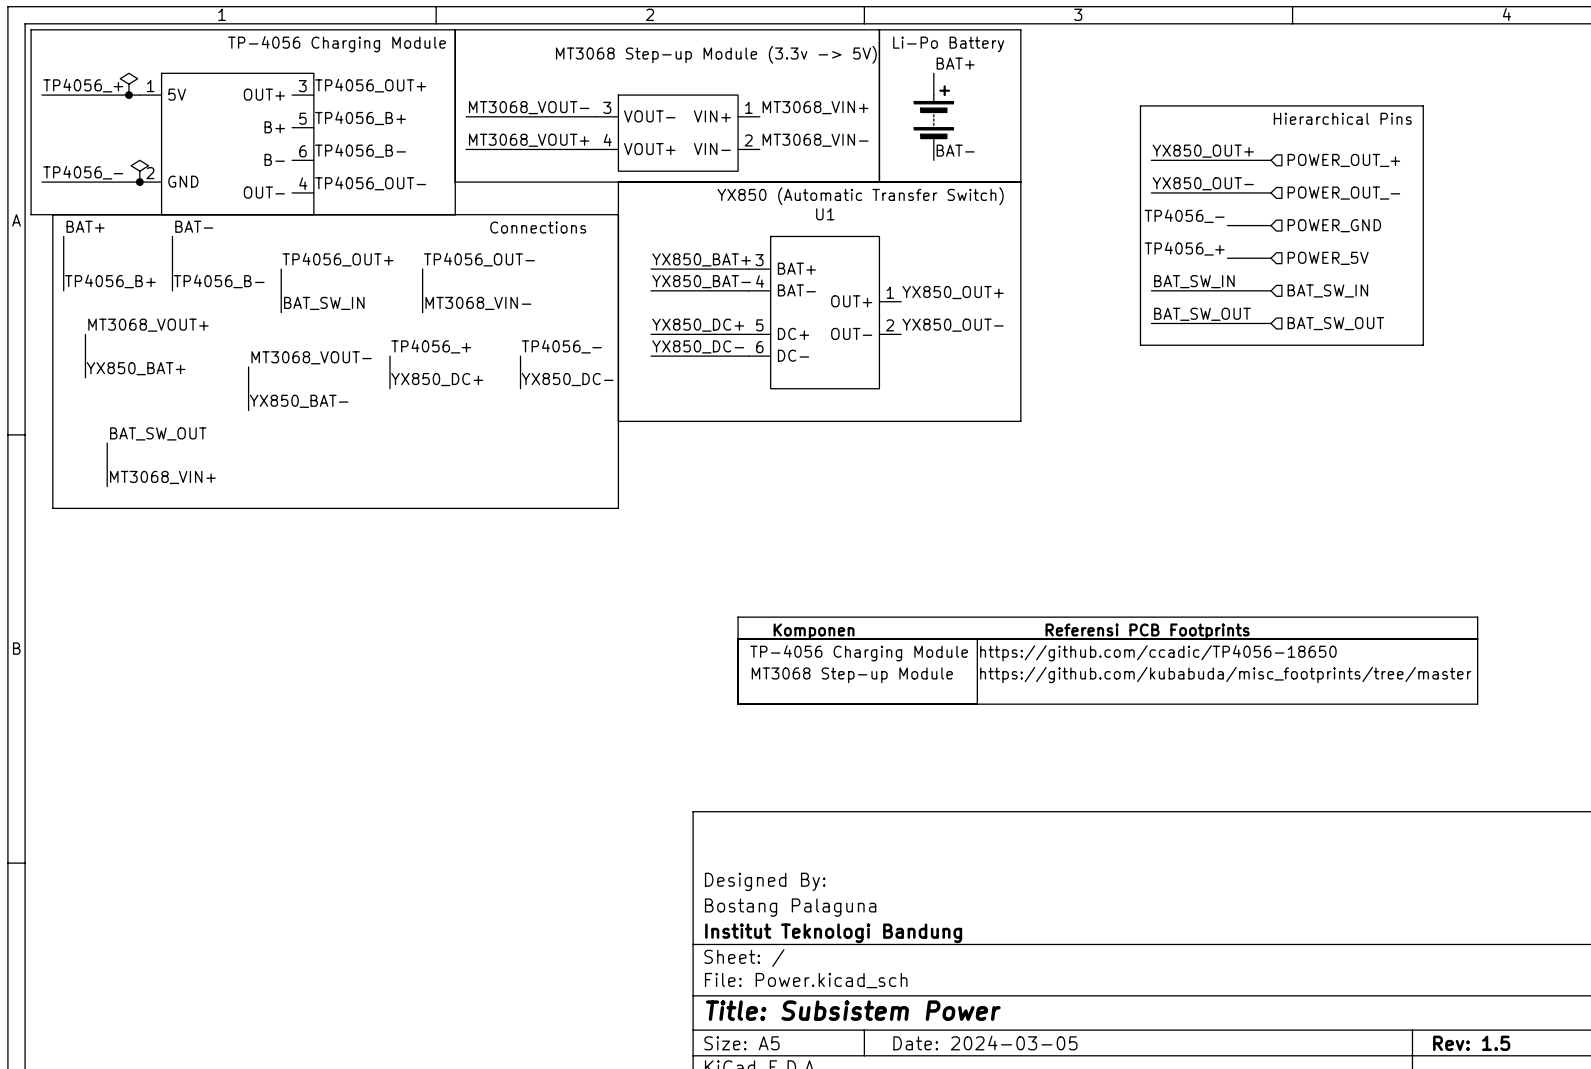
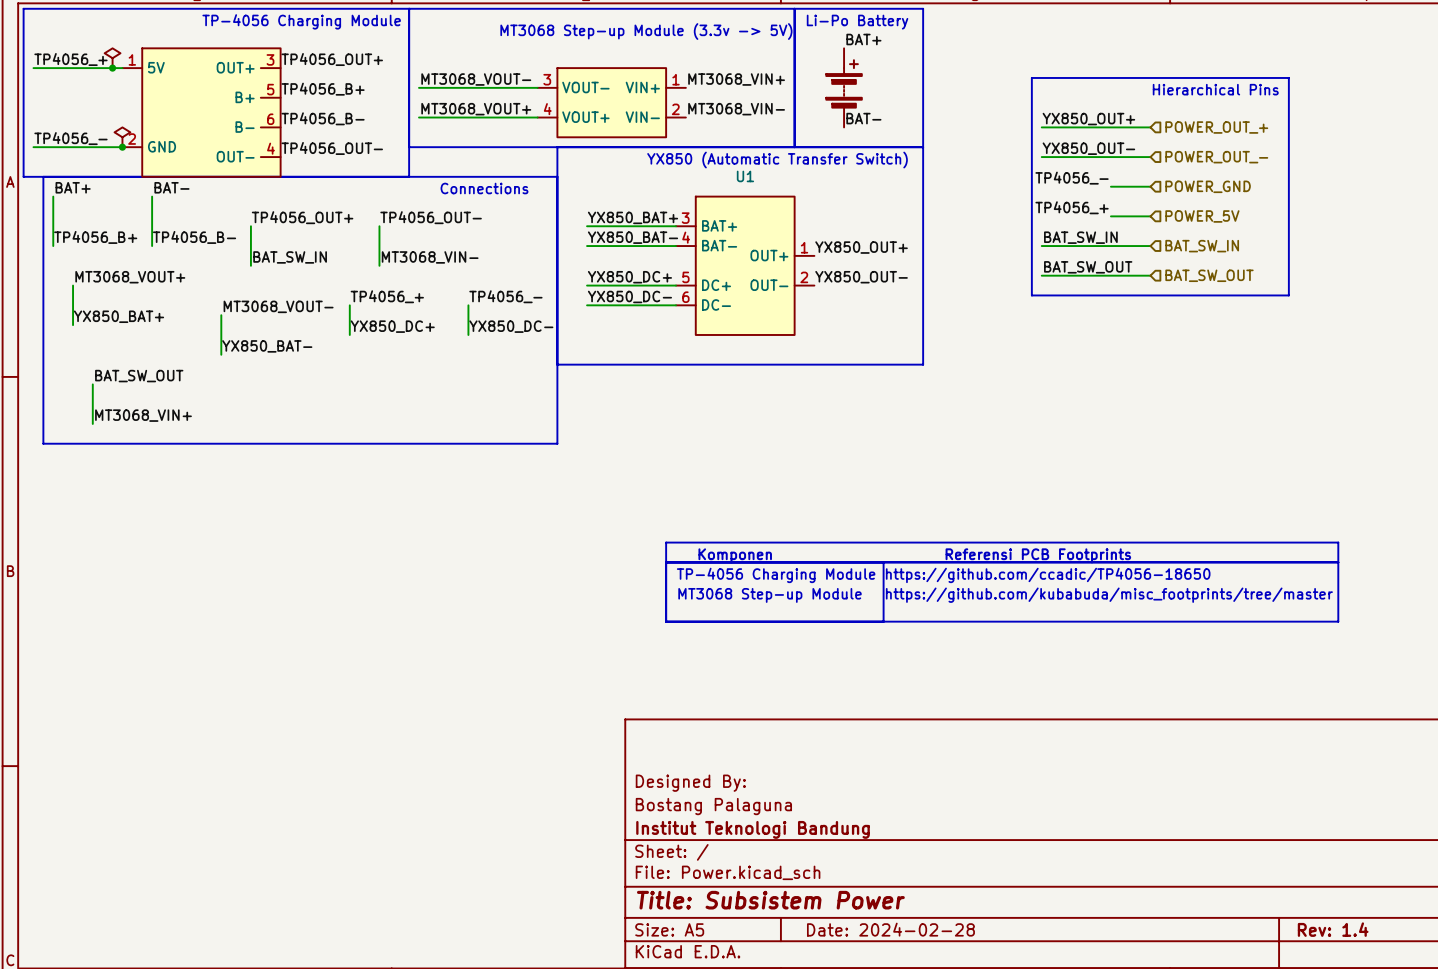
title block: Date: 2024-03-05 (985, 1043) -> Date: 2024-02-28 (890, 929)
title block: Rev: 1.5 (1471, 1043) -> Rev: 1.4 (1333, 929)

